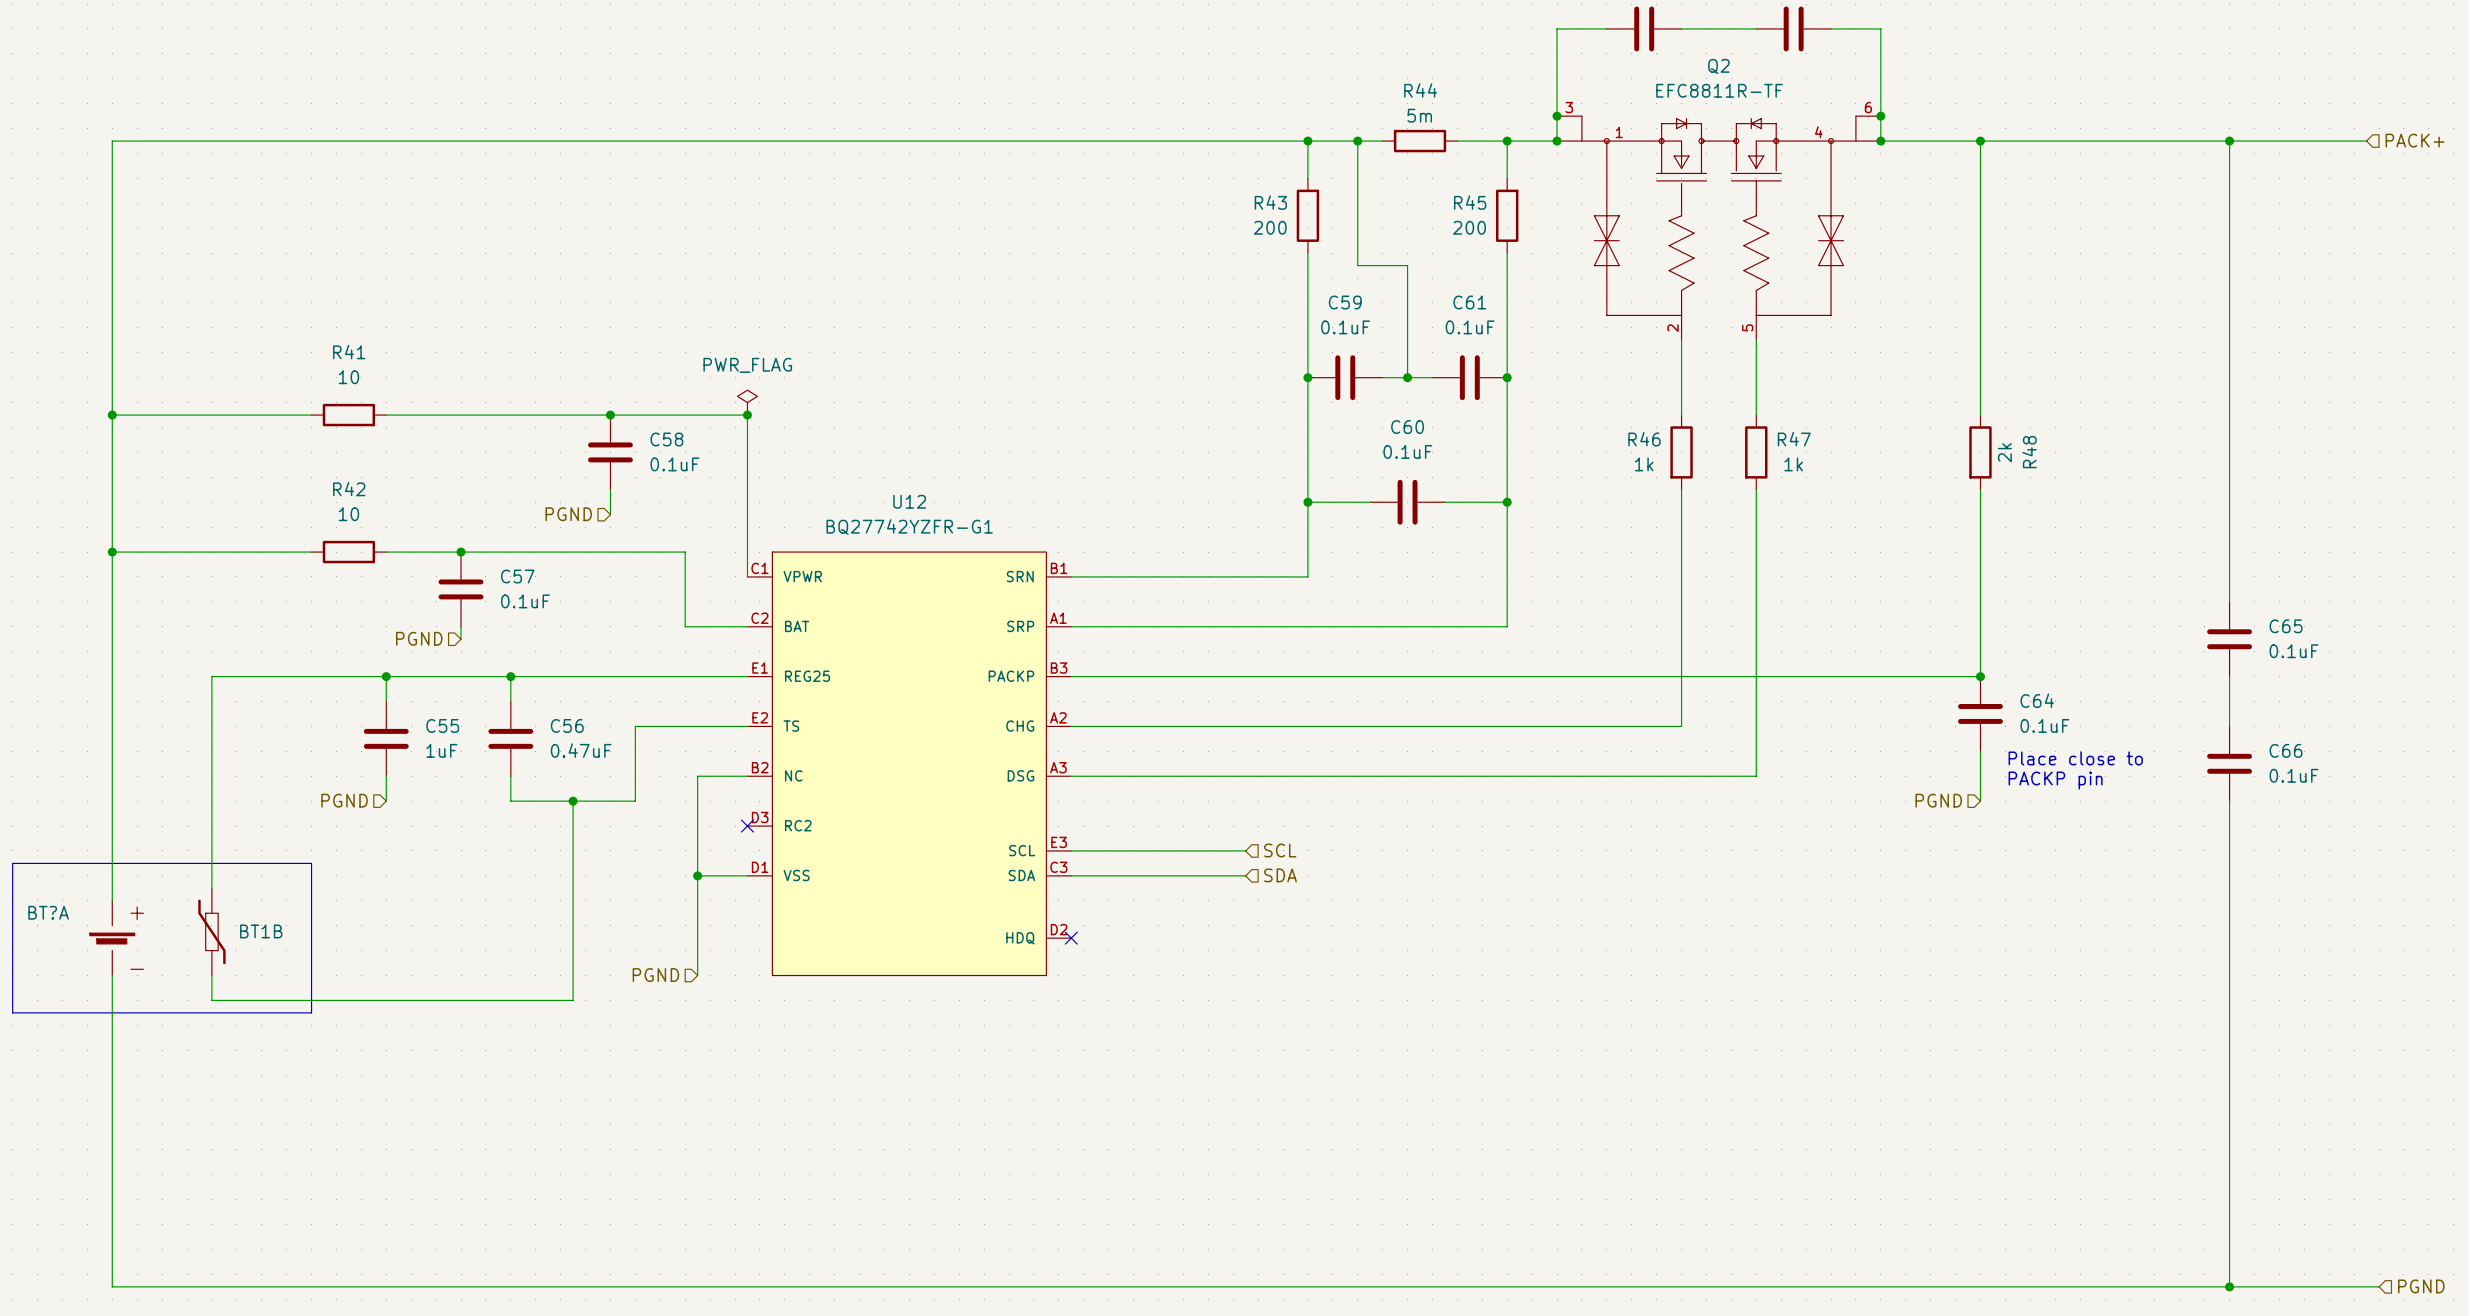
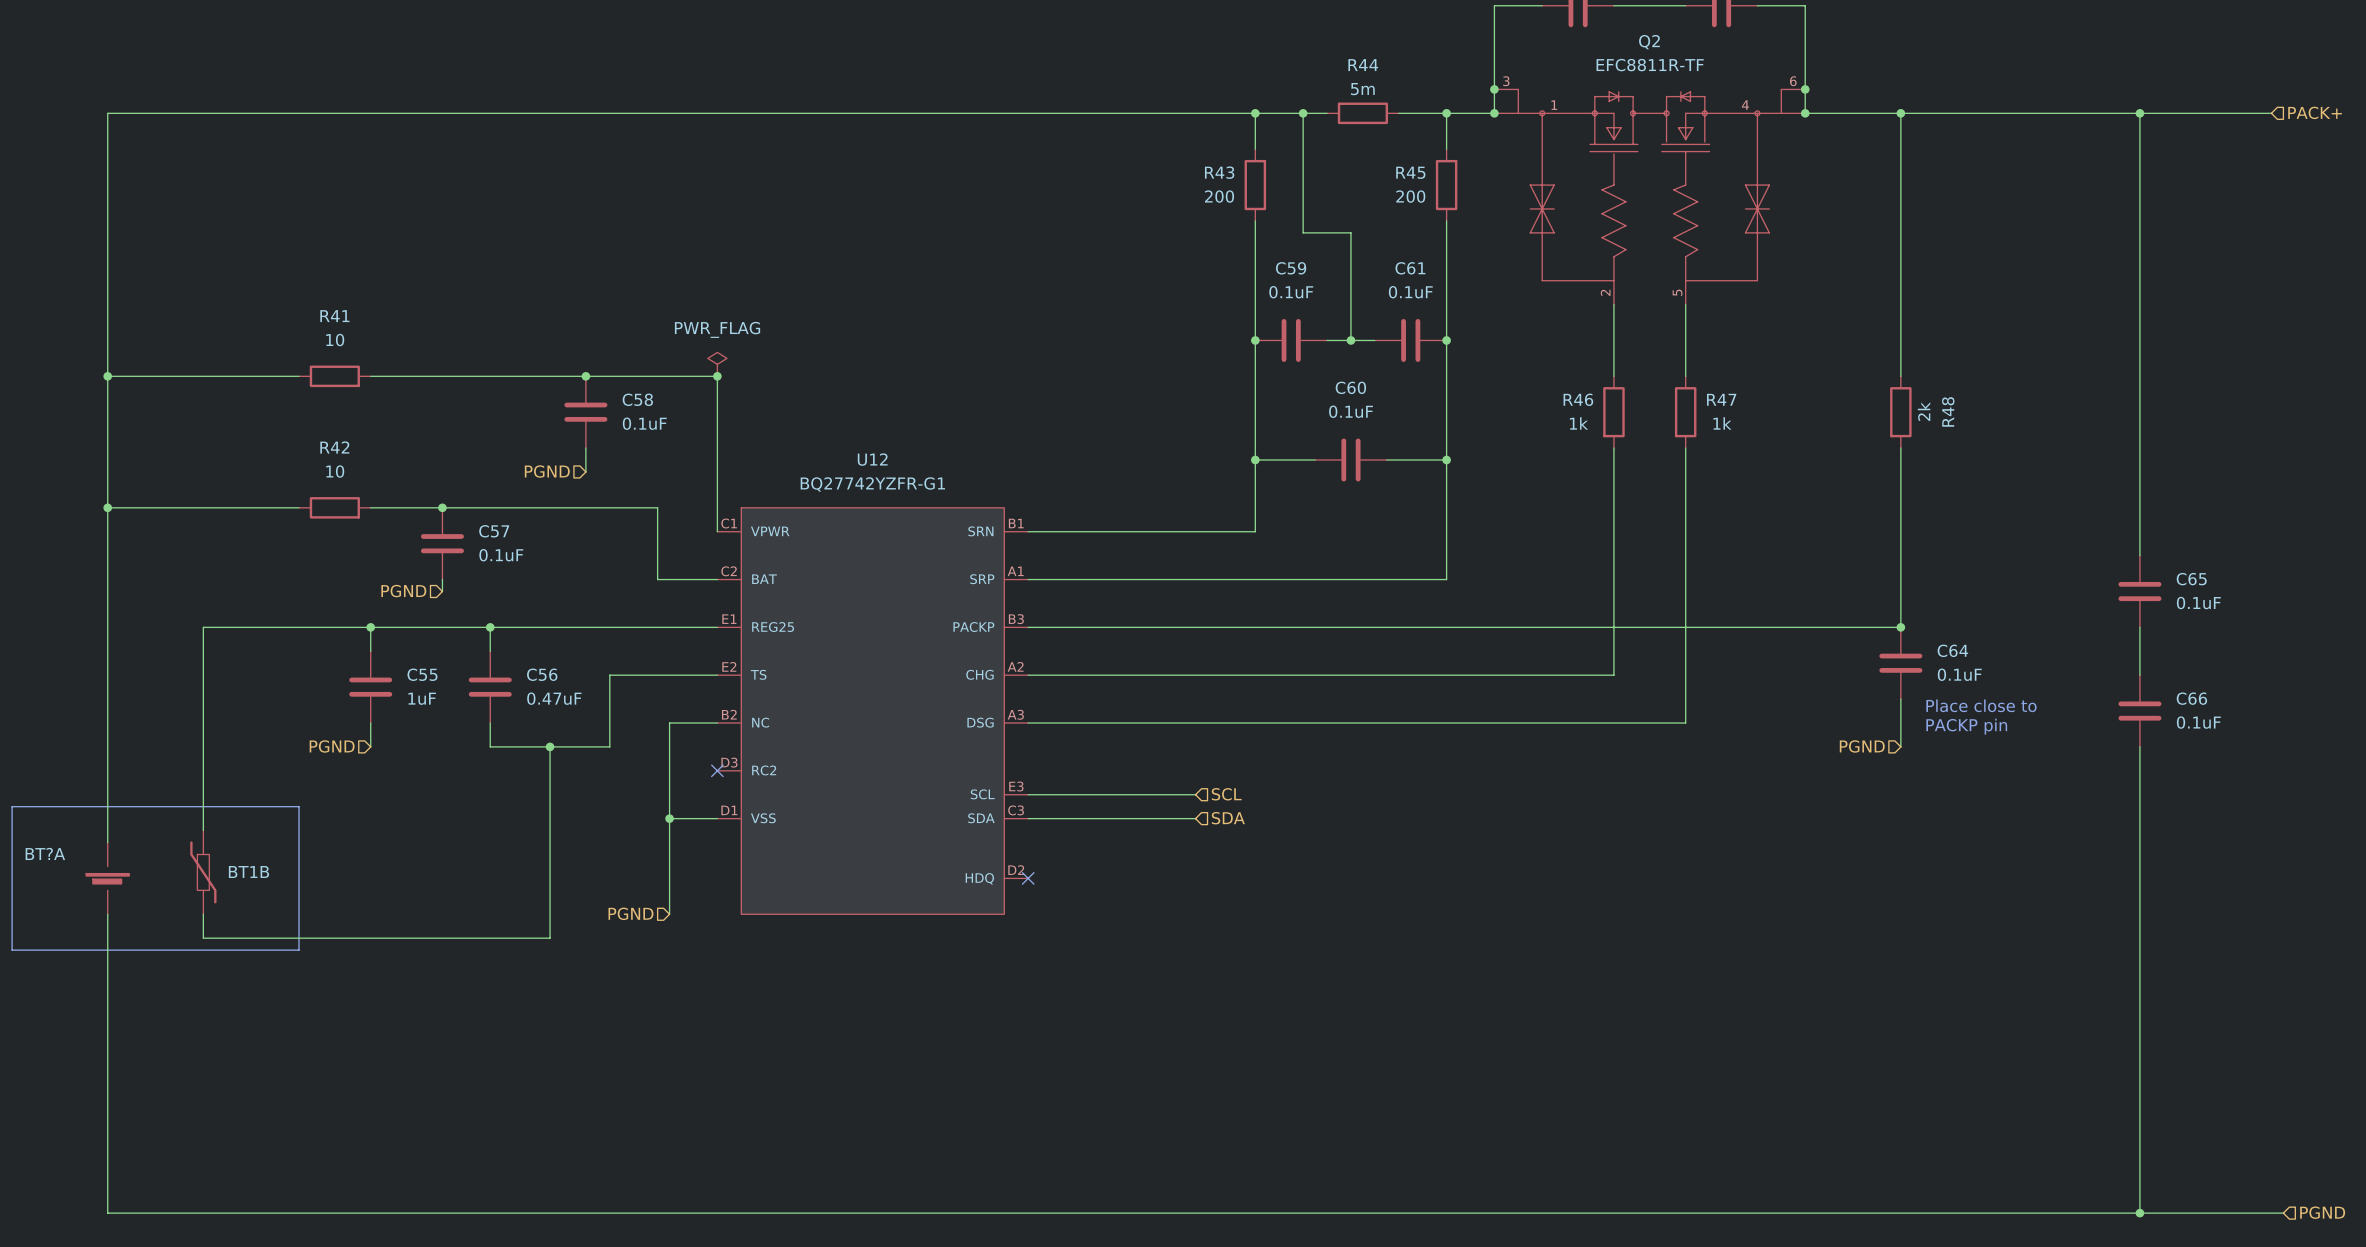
BT?A symbol: [89, 900, 144, 976] -> [86, 842, 130, 915]

